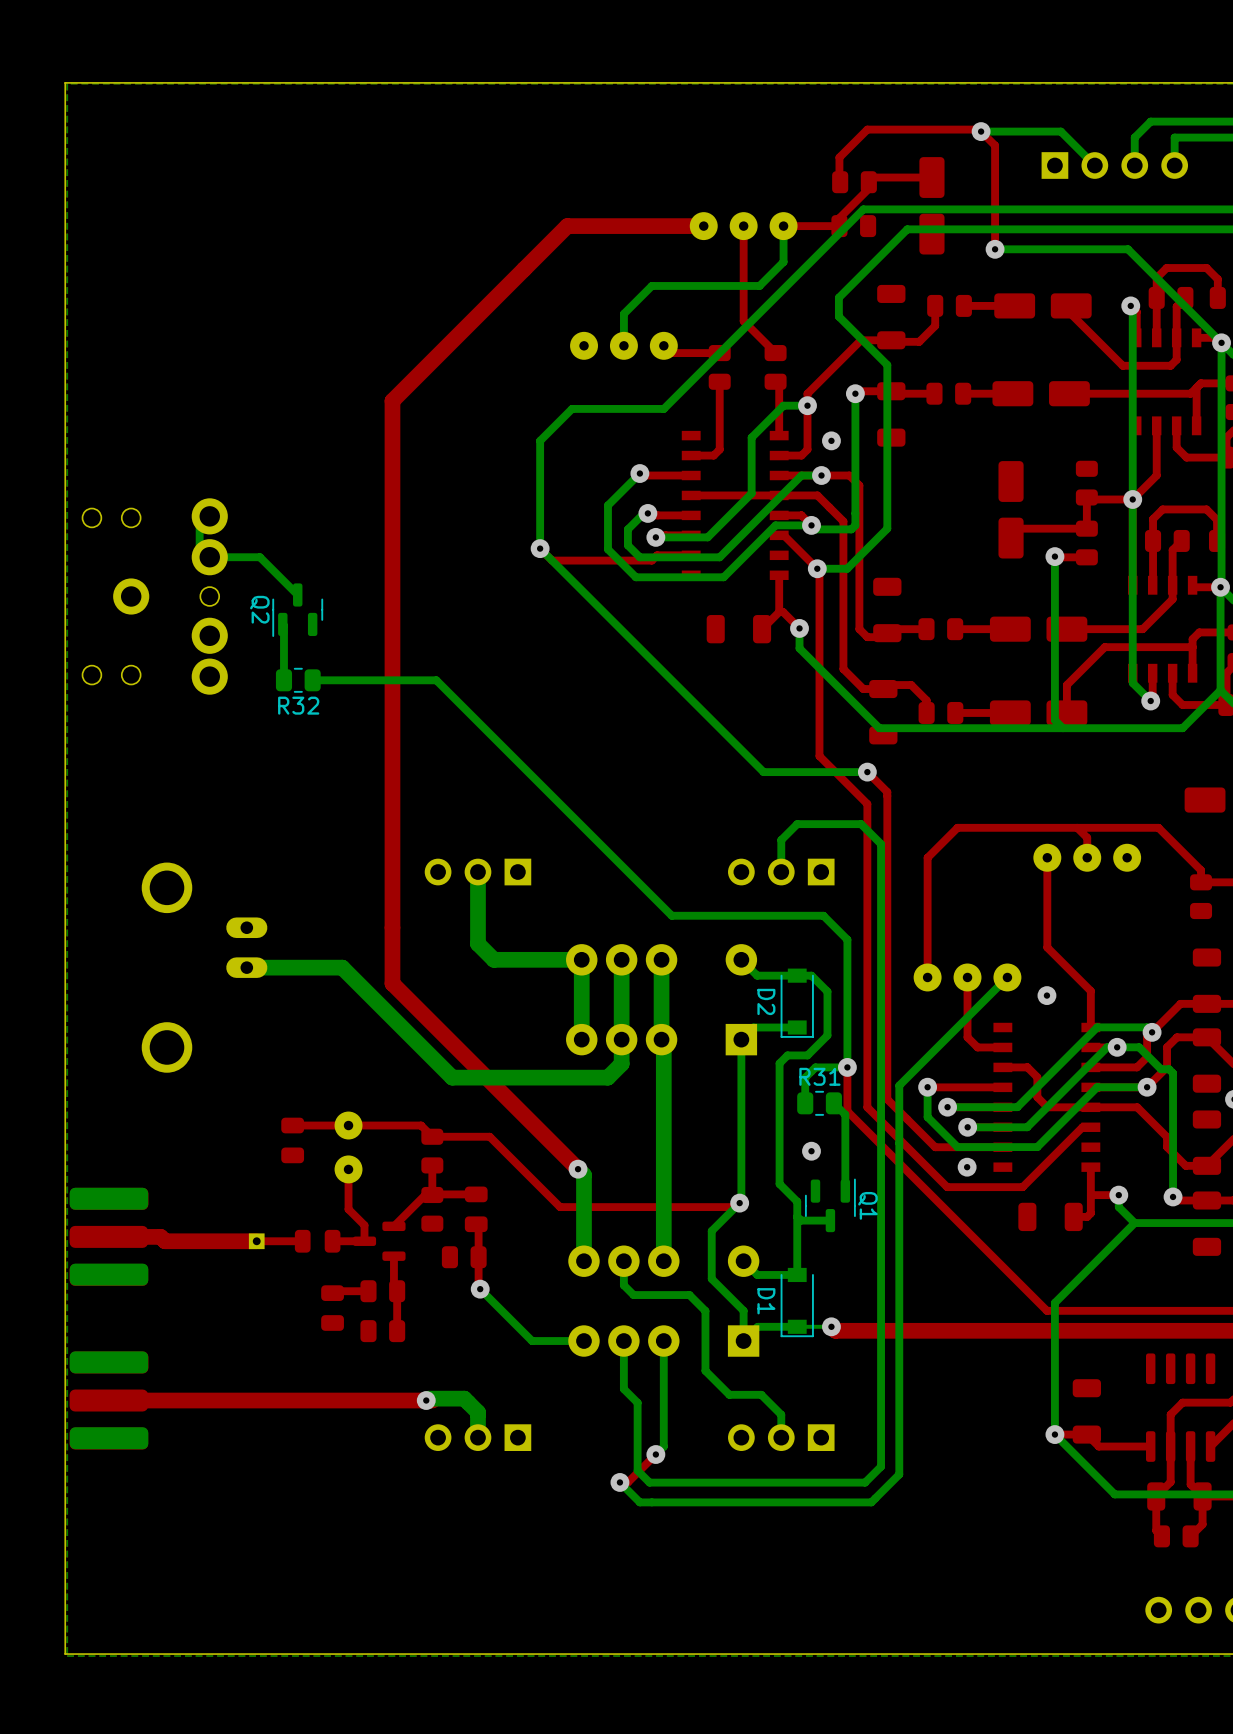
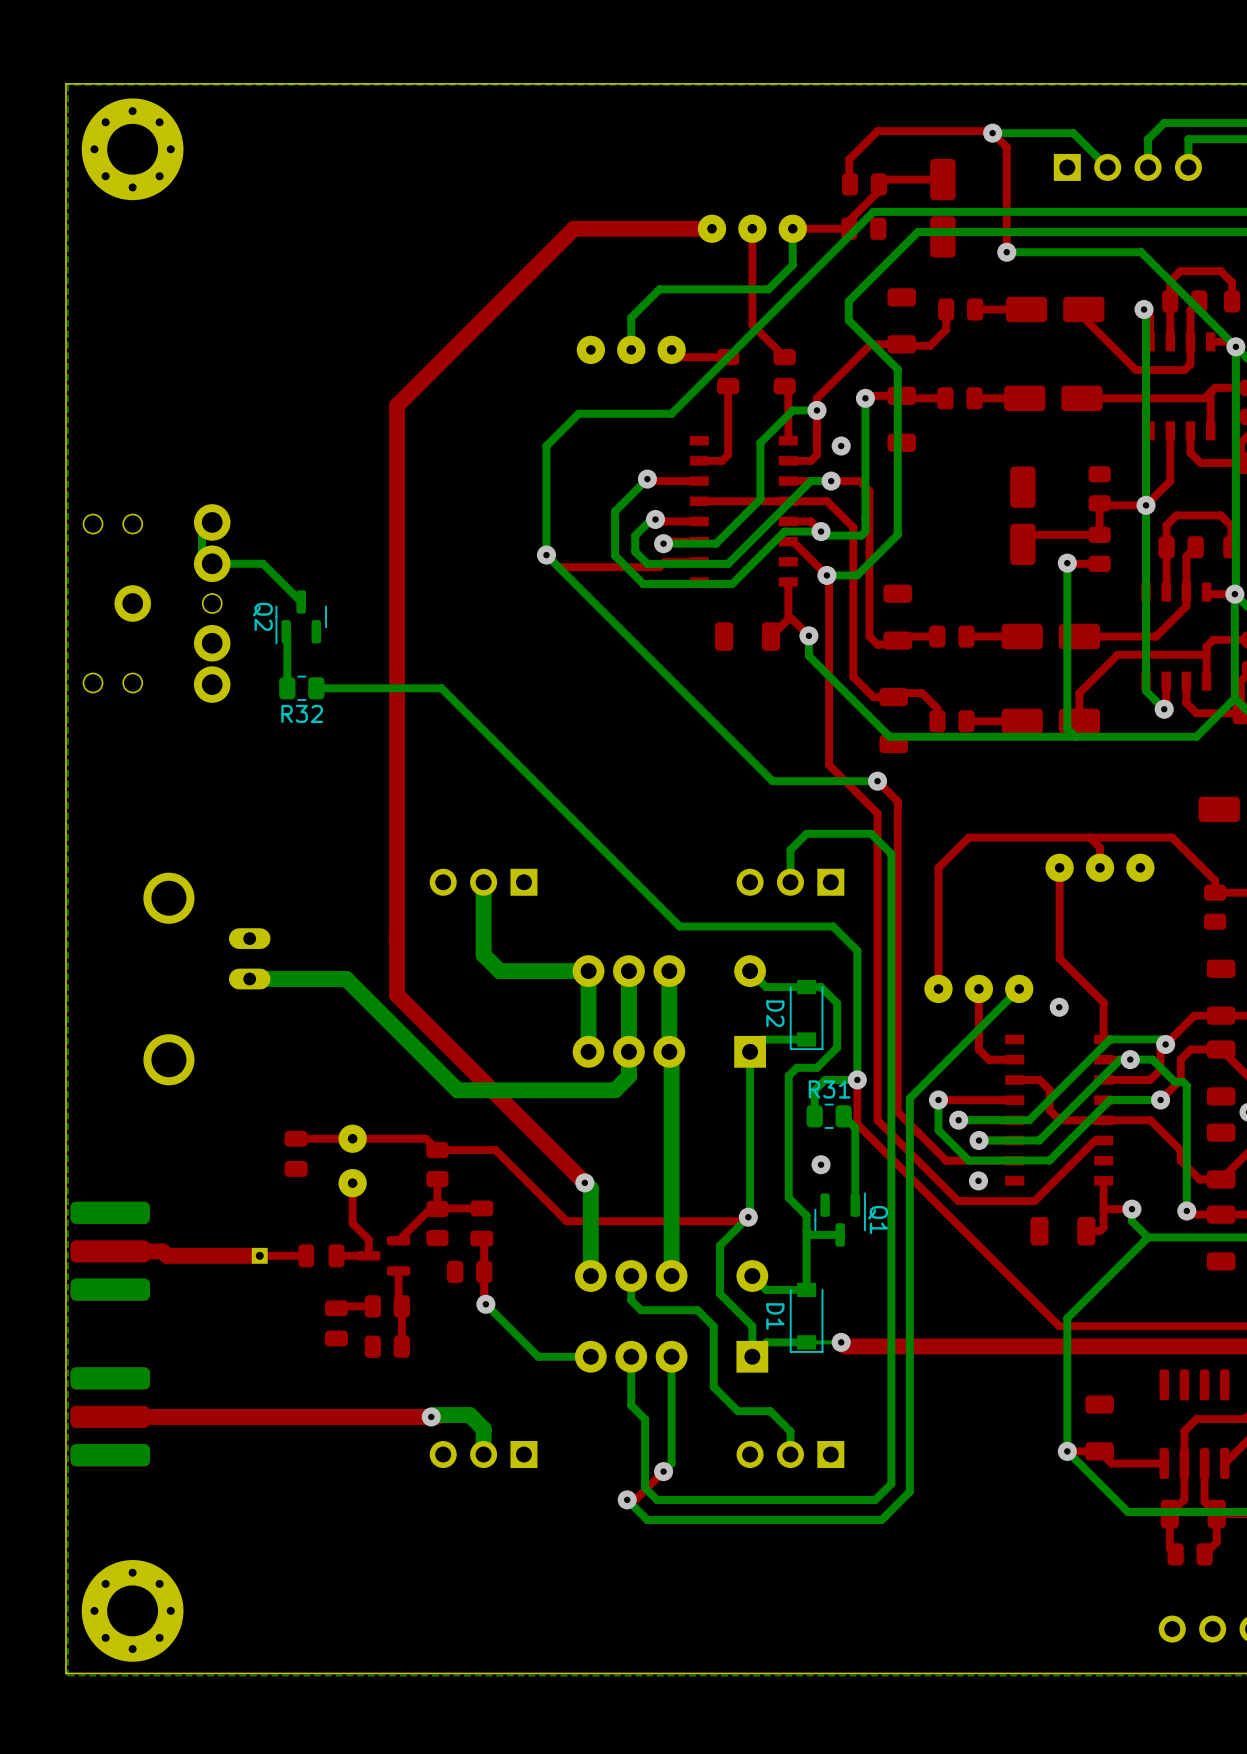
part: none -> (132, 149)
part: none -> (132, 1610)

